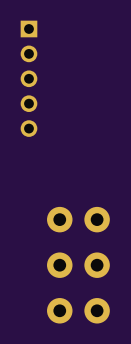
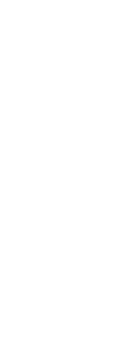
part: (28, 78) -> none
part: (78, 219) -> none
part: (78, 265) -> none
part: (78, 310) -> none

